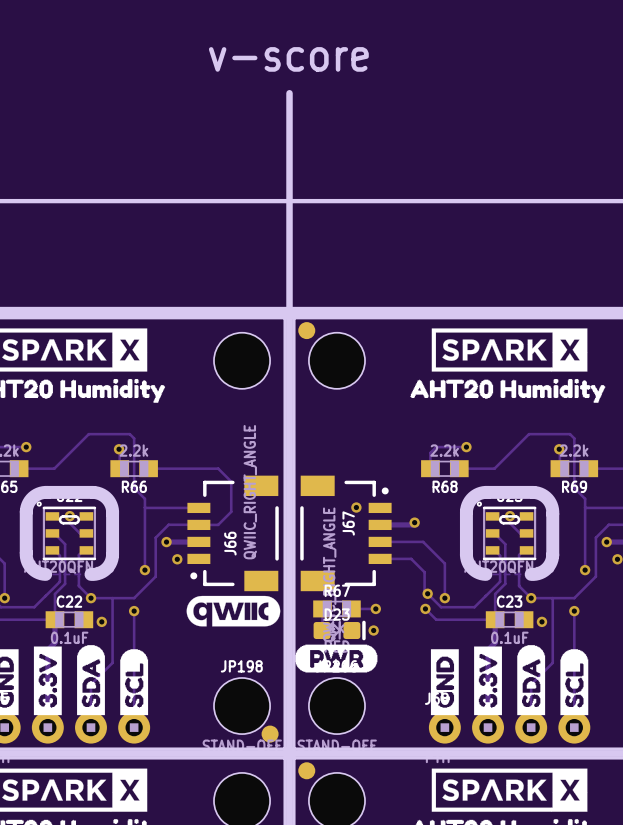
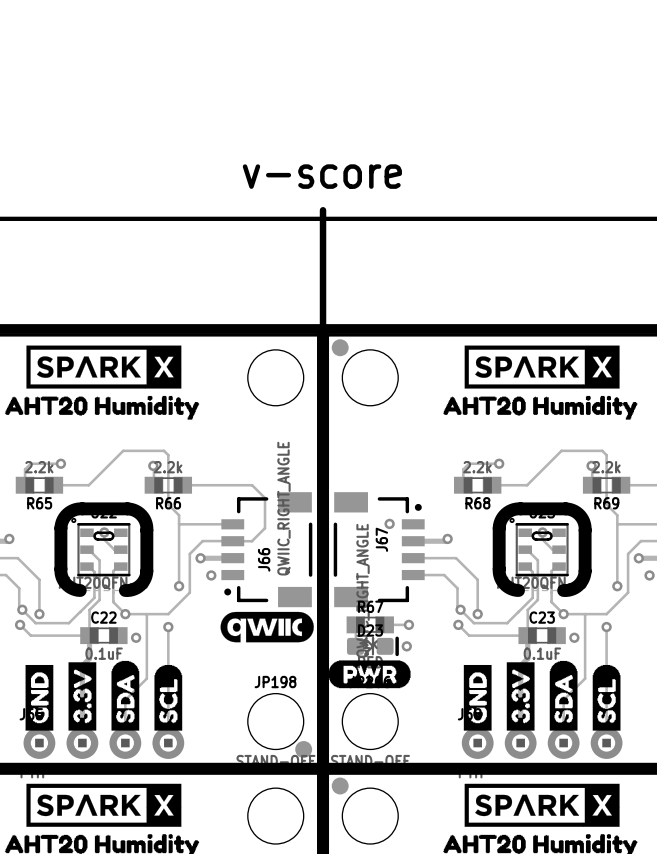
text position: v-score (288, 59) -> v-score (322, 176)
board edge: (289, 93) (289, 192) -> none

